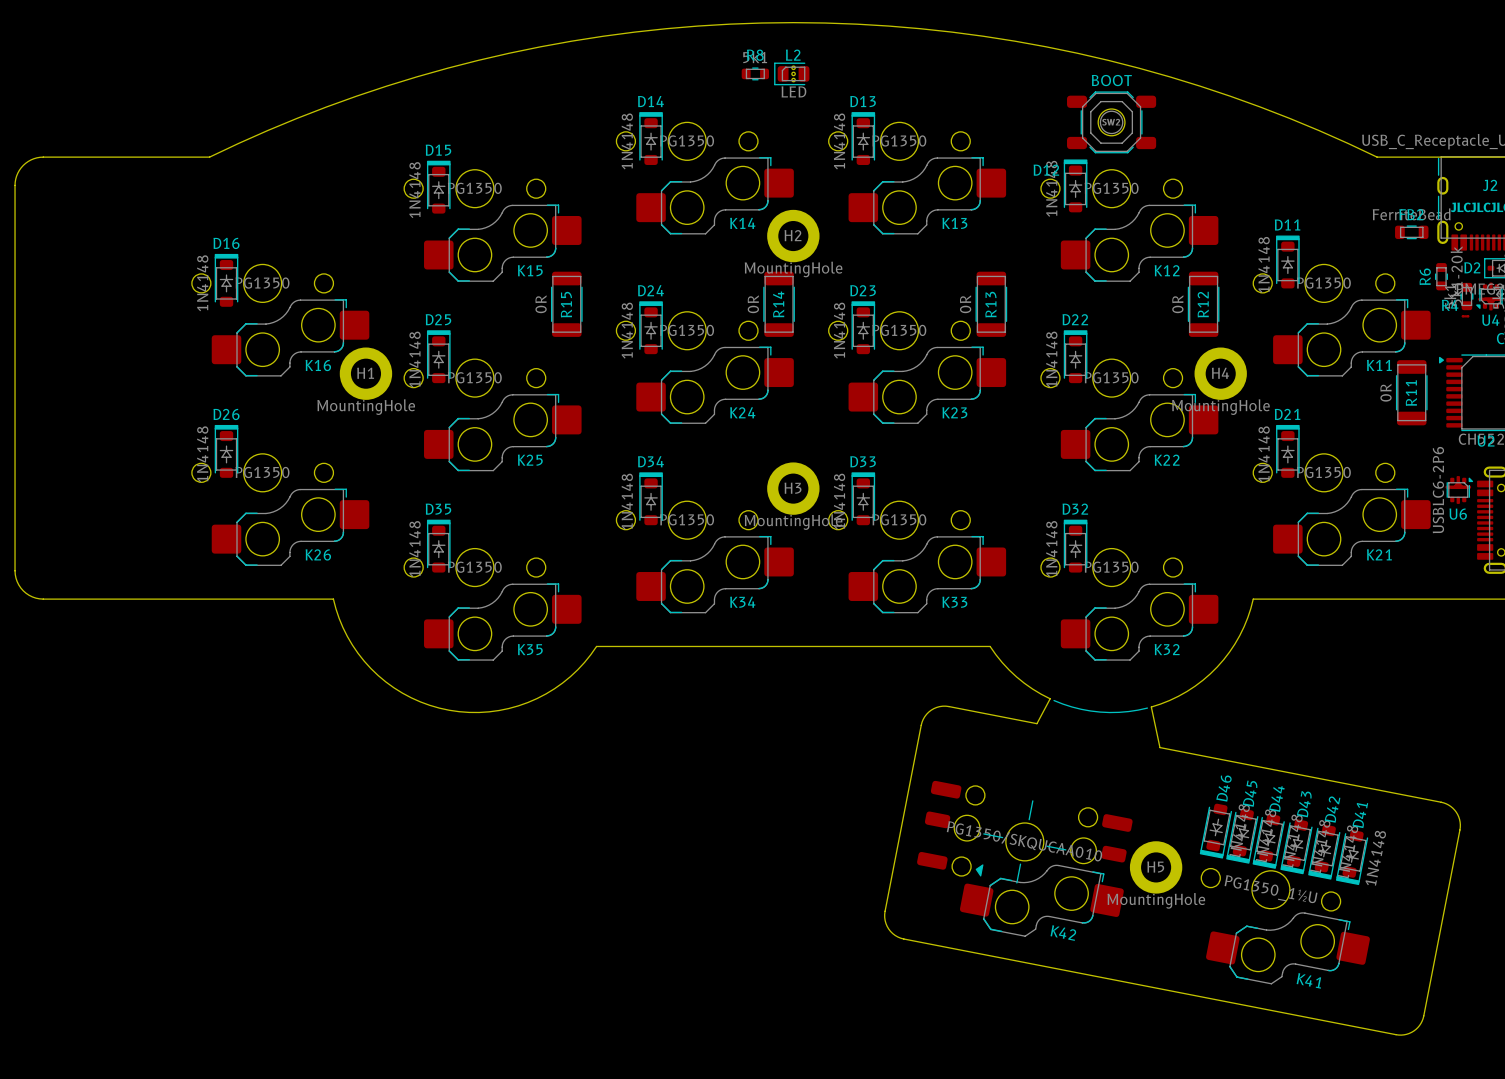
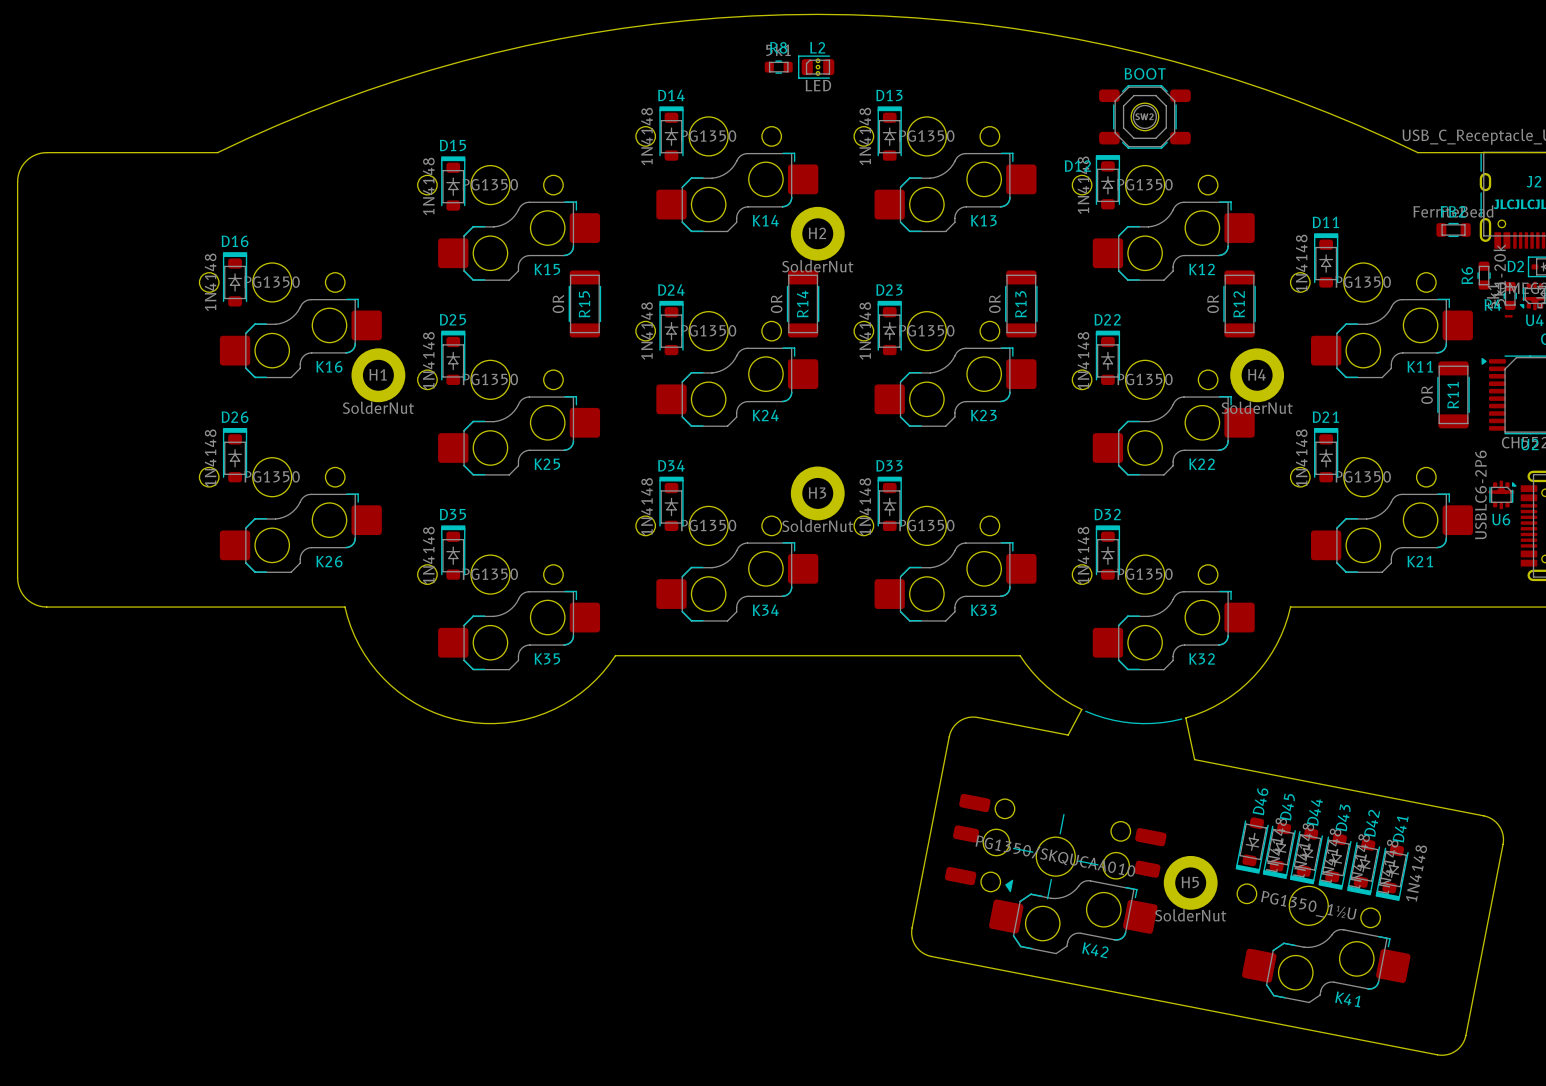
H2 value: MountingHole (793, 269) -> SolderNut (817, 266)
H1 value: MountingHole (366, 407) -> SolderNut (378, 407)
H4 value: MountingHole (1220, 407) -> SolderNut (1257, 407)
H3 value: MountingHole (793, 522) -> SolderNut (817, 525)
H5 value: MountingHole (1156, 900) -> SolderNut (1190, 915)

